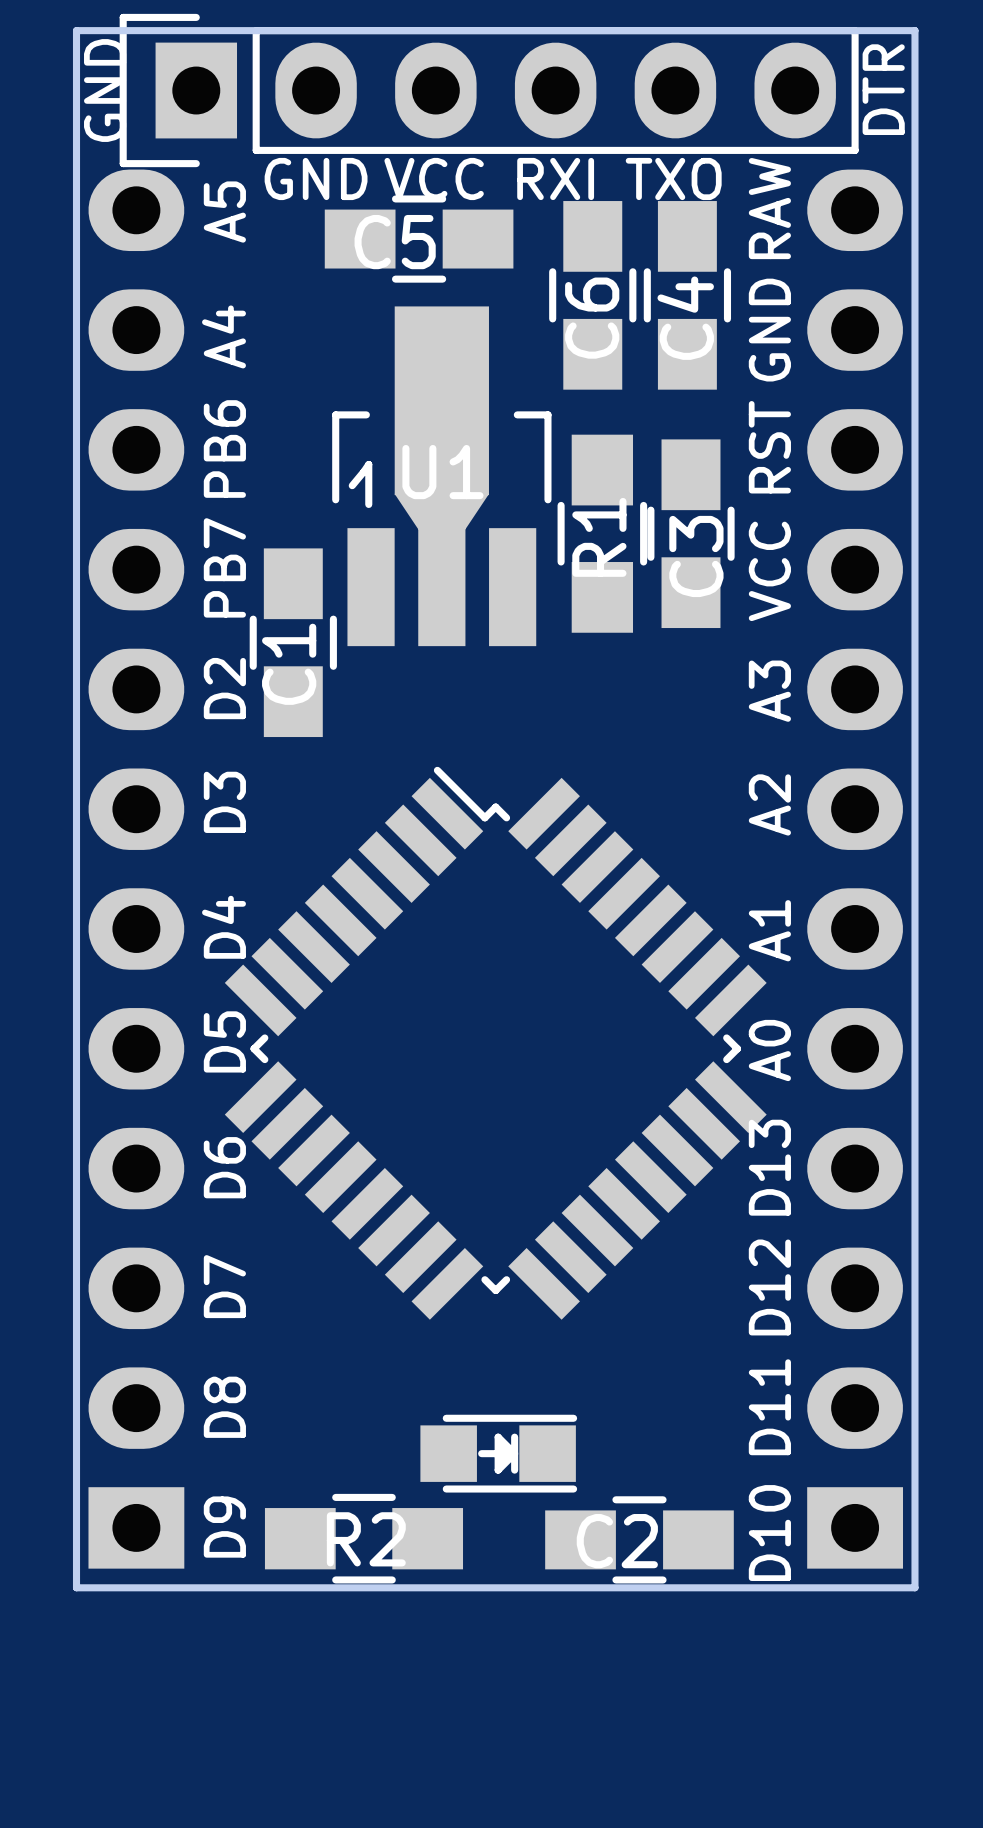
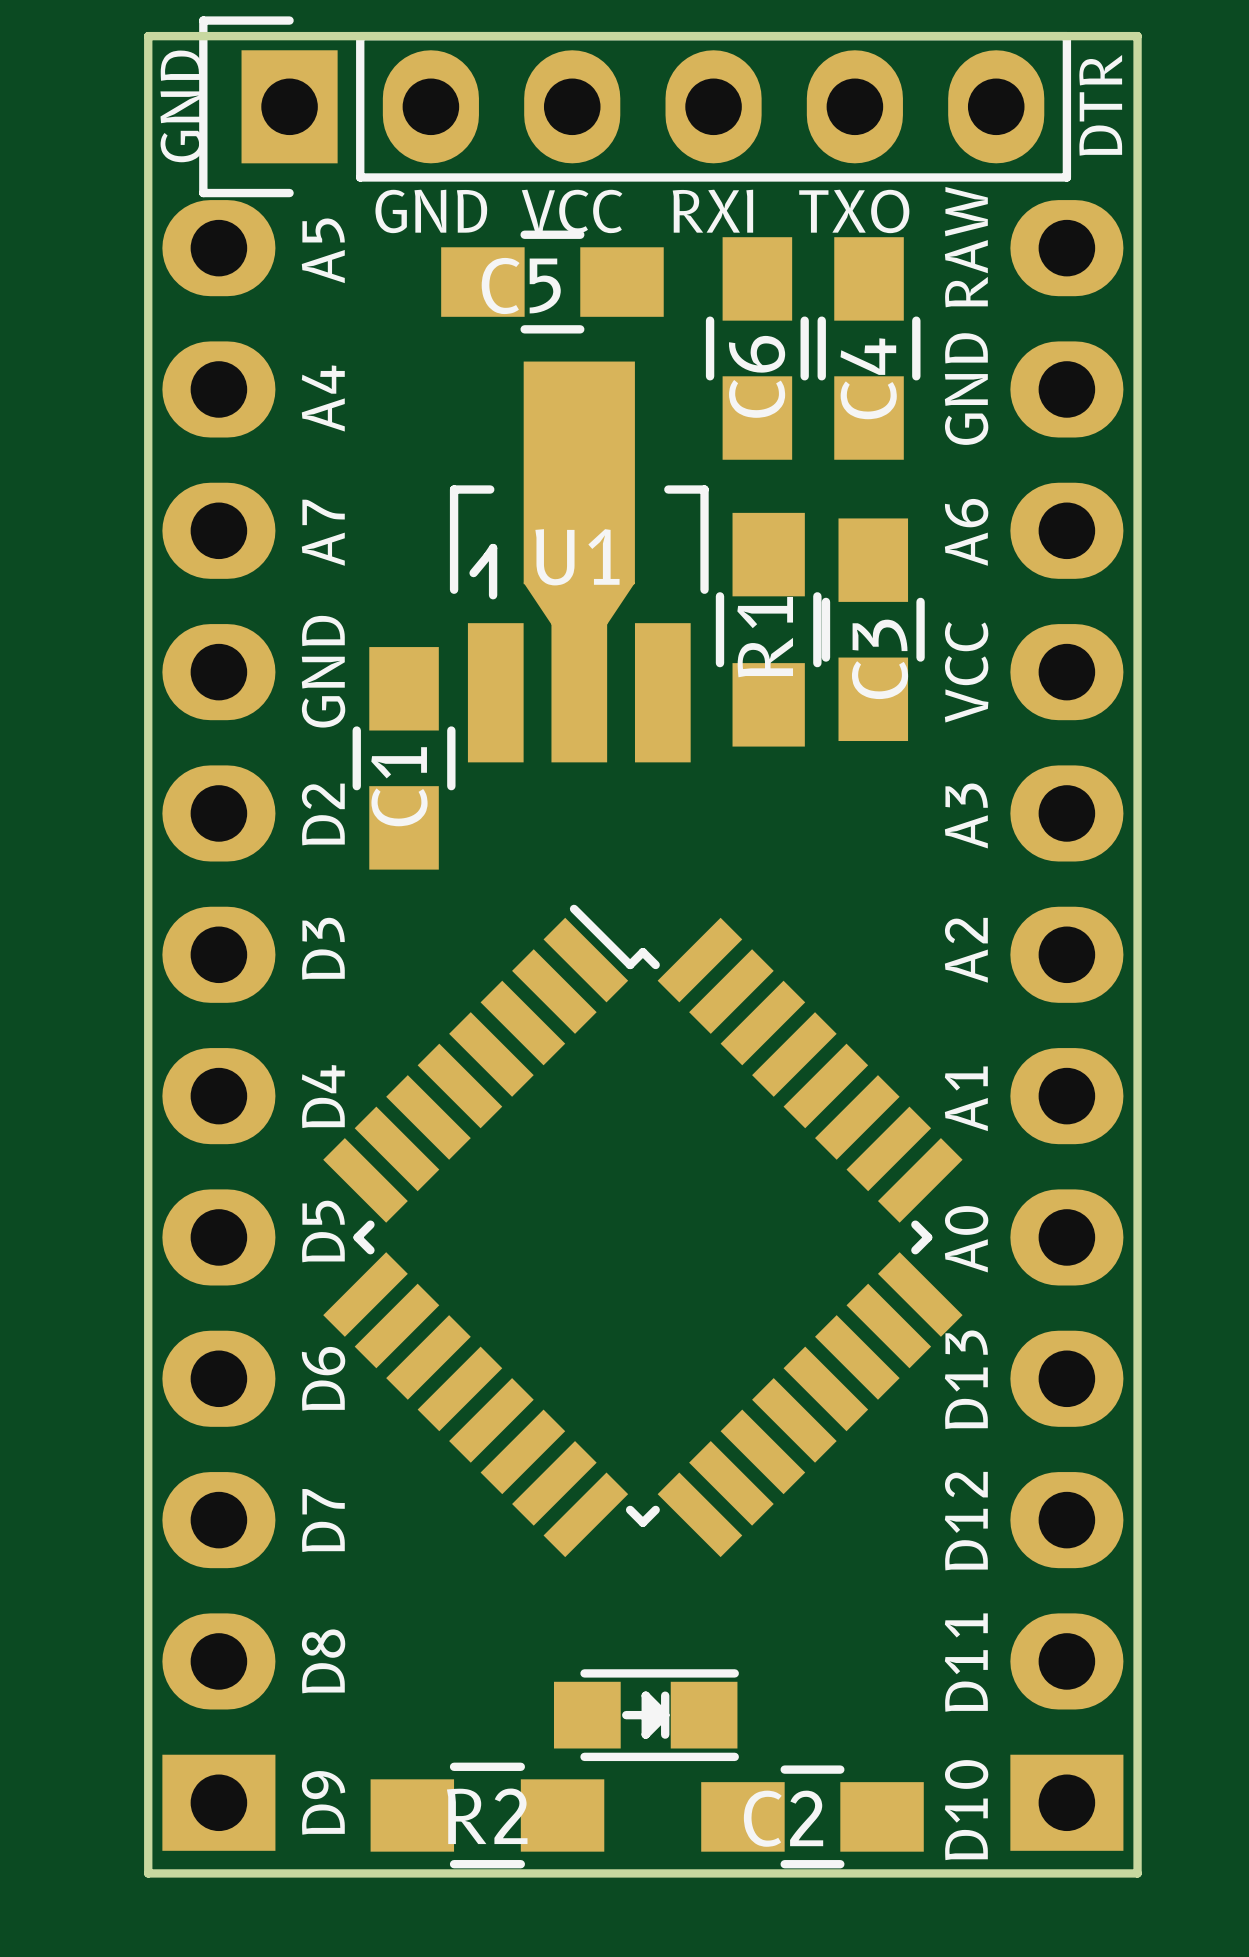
text: RST (769, 447) -> A6 (966, 532)
text: PB6 (224, 449) -> A7 (323, 532)
text: PB7 (224, 567) -> GND (323, 671)

